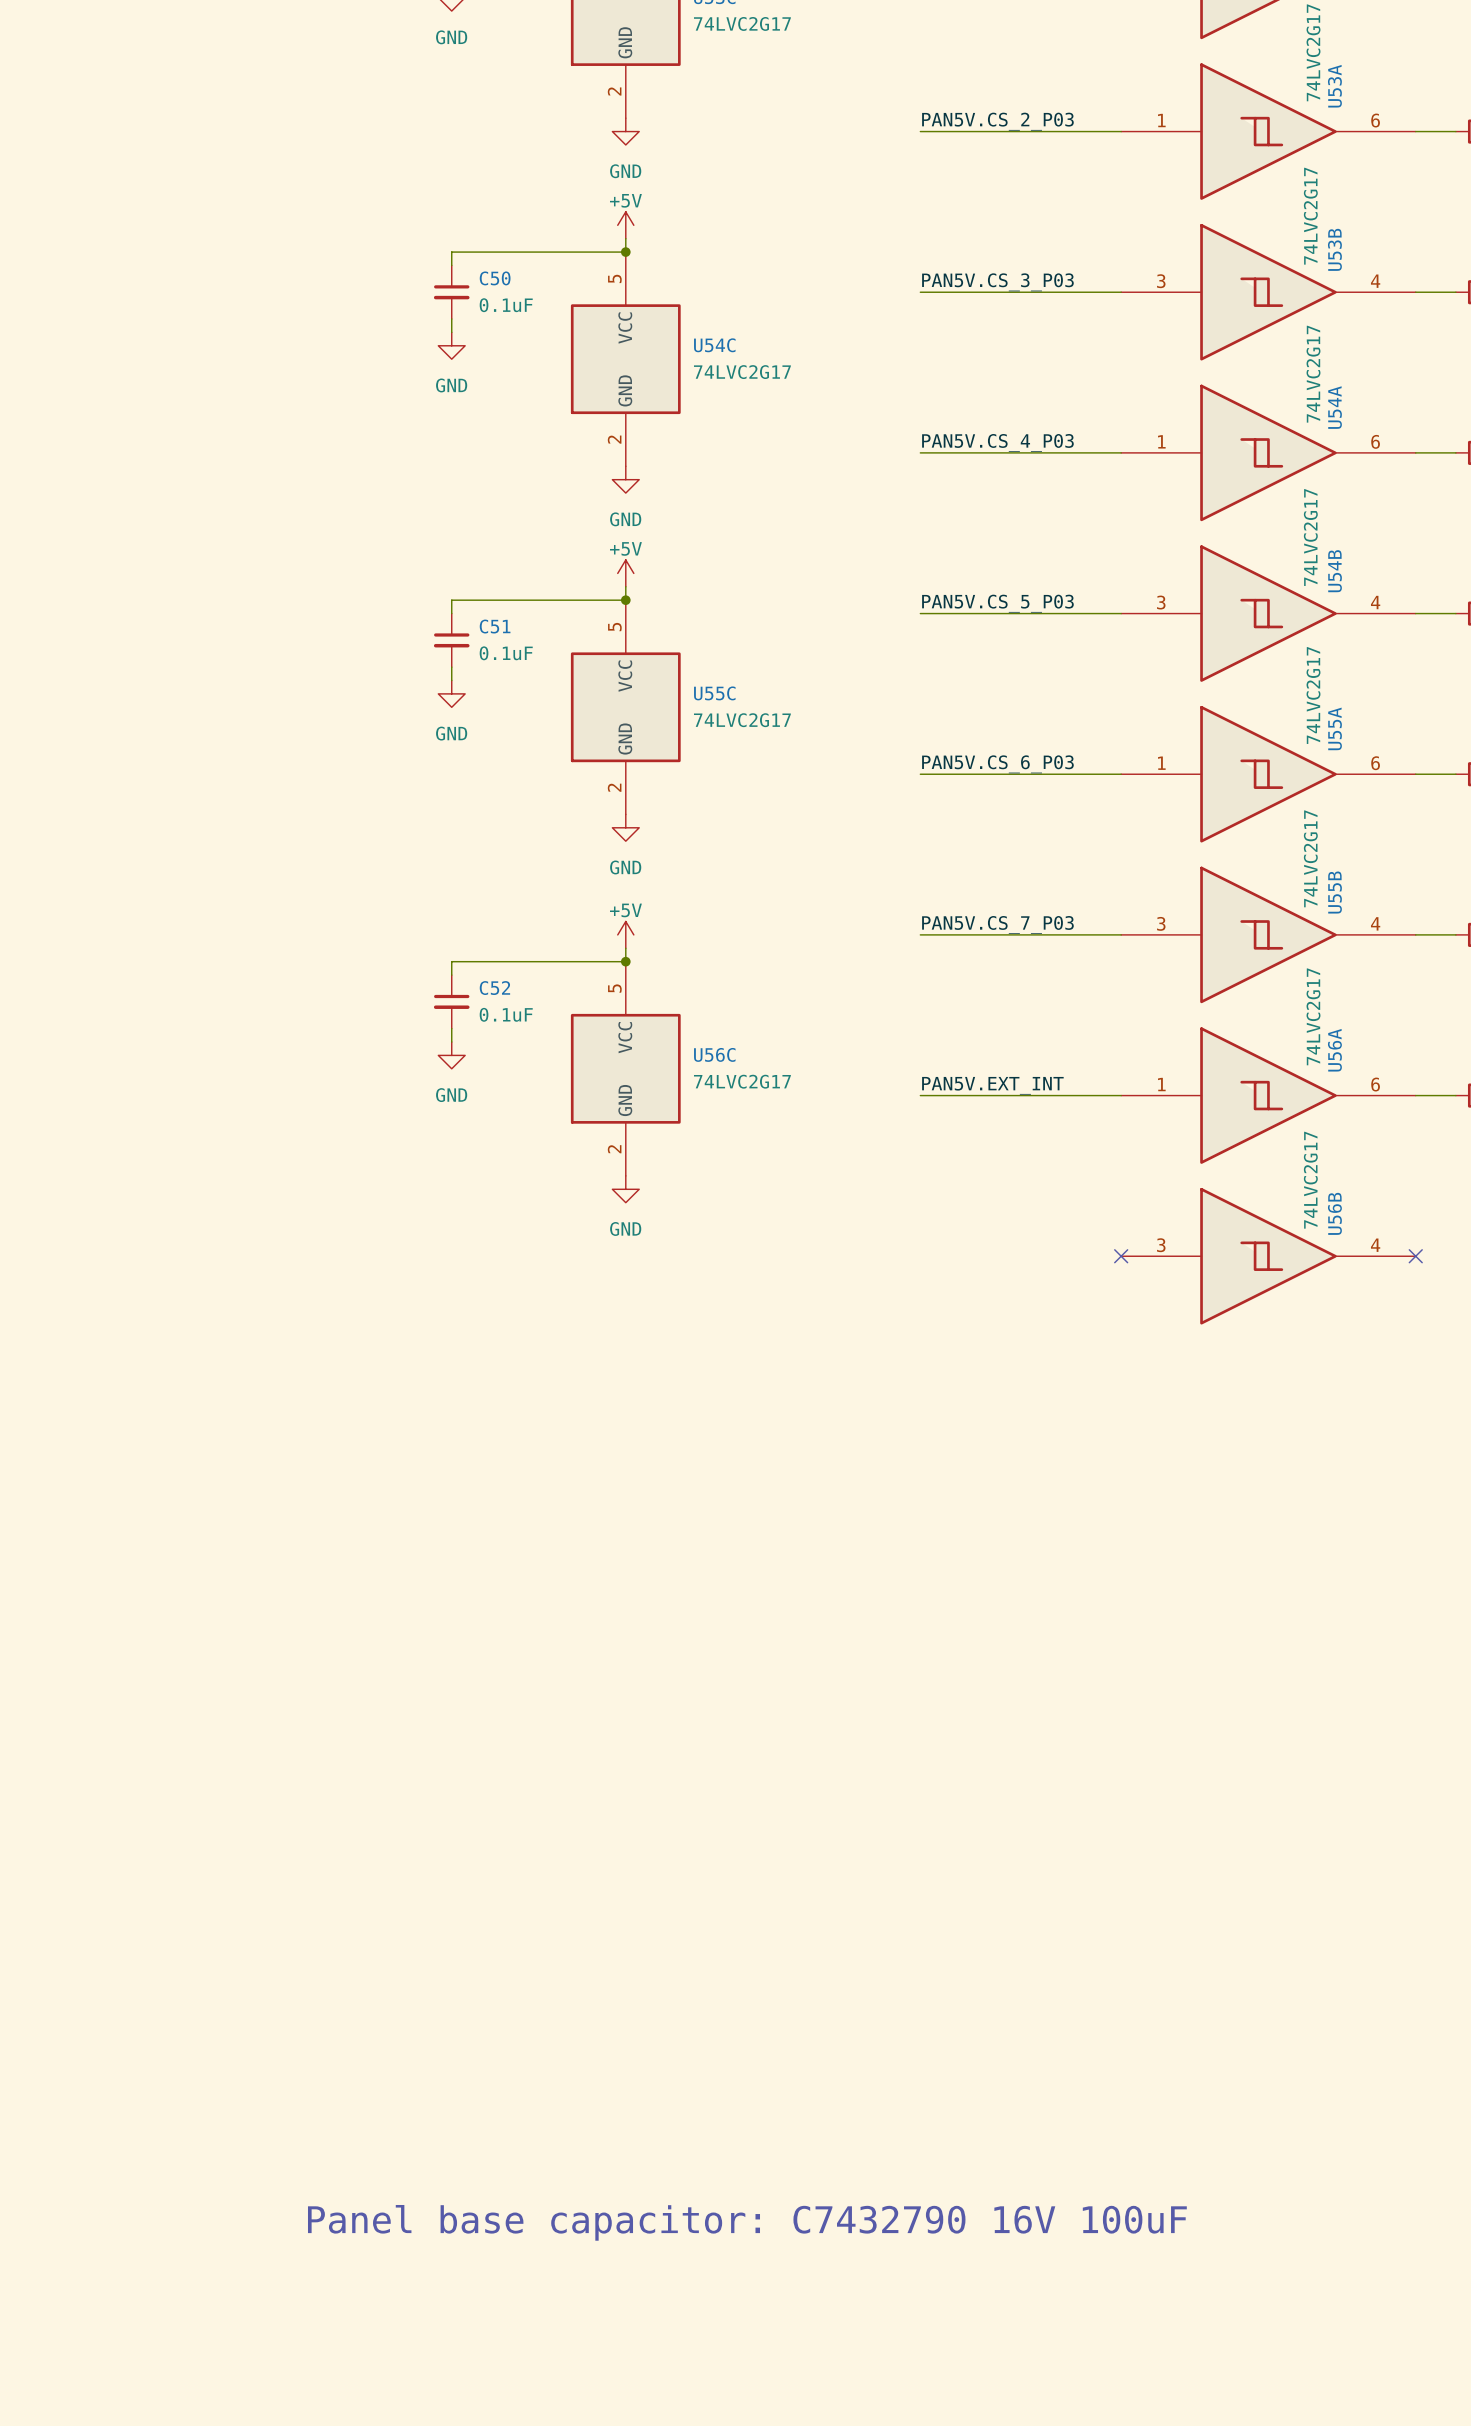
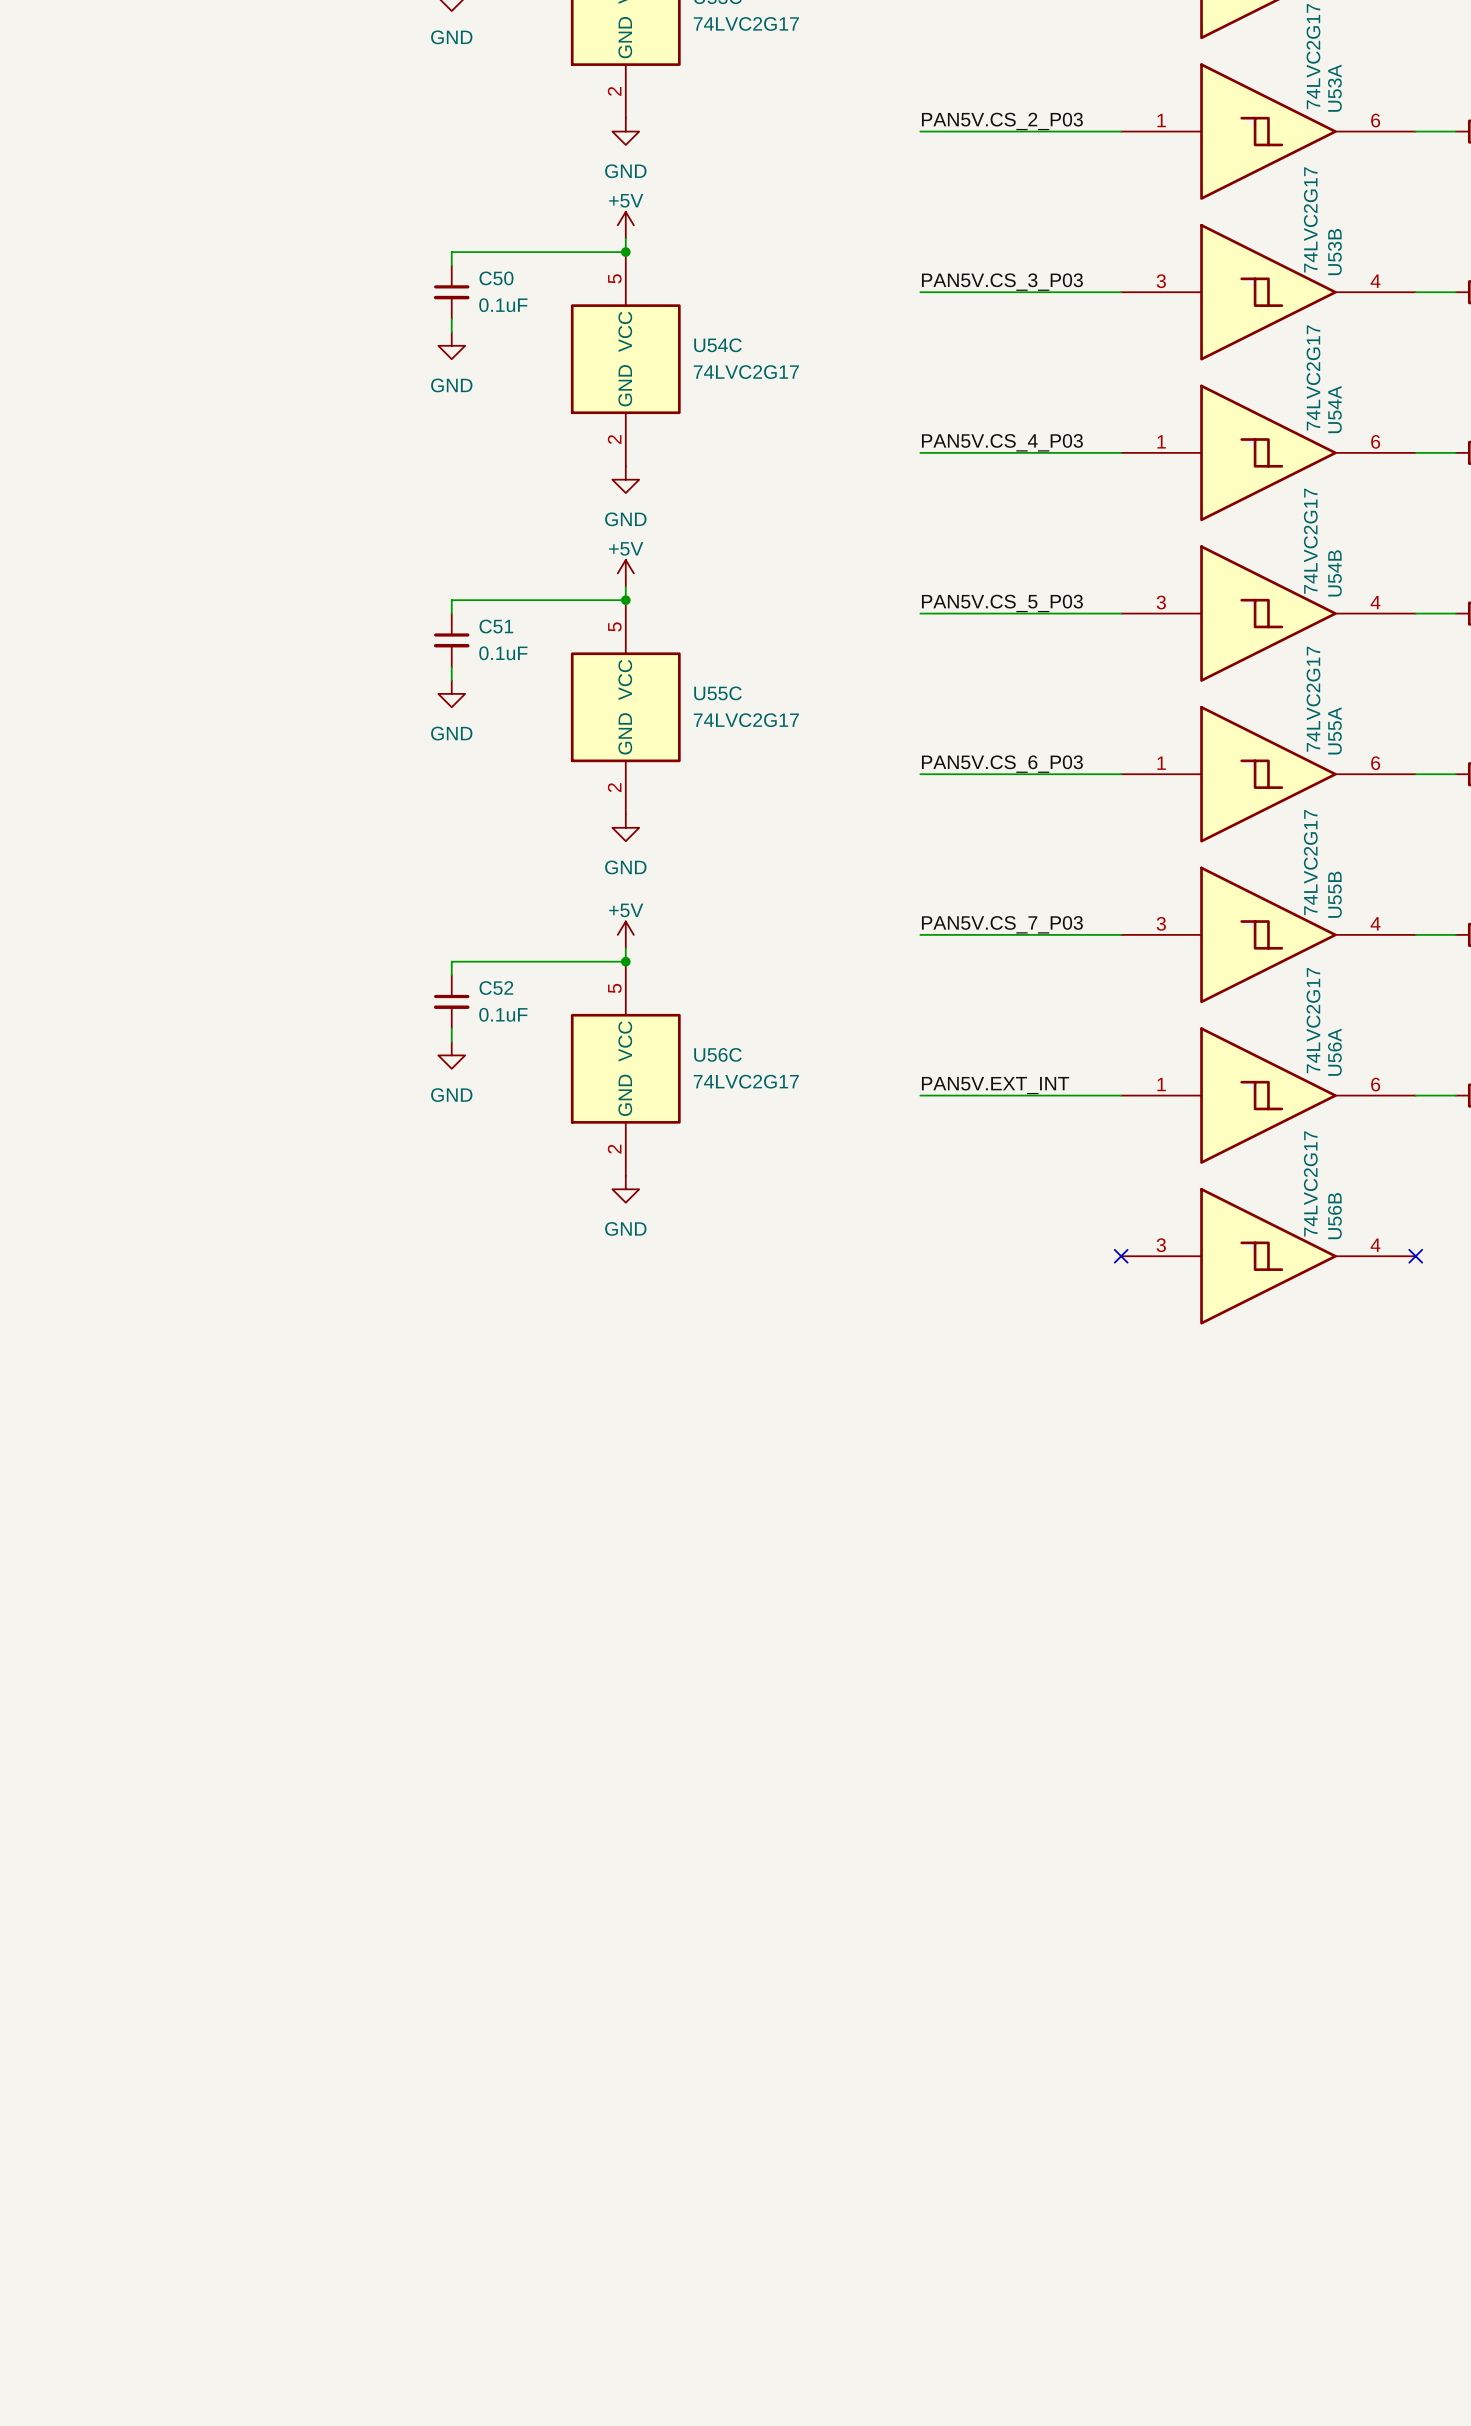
text: Panel base capacitor: C7432790 16V 100uF (747, 2222) -> none

